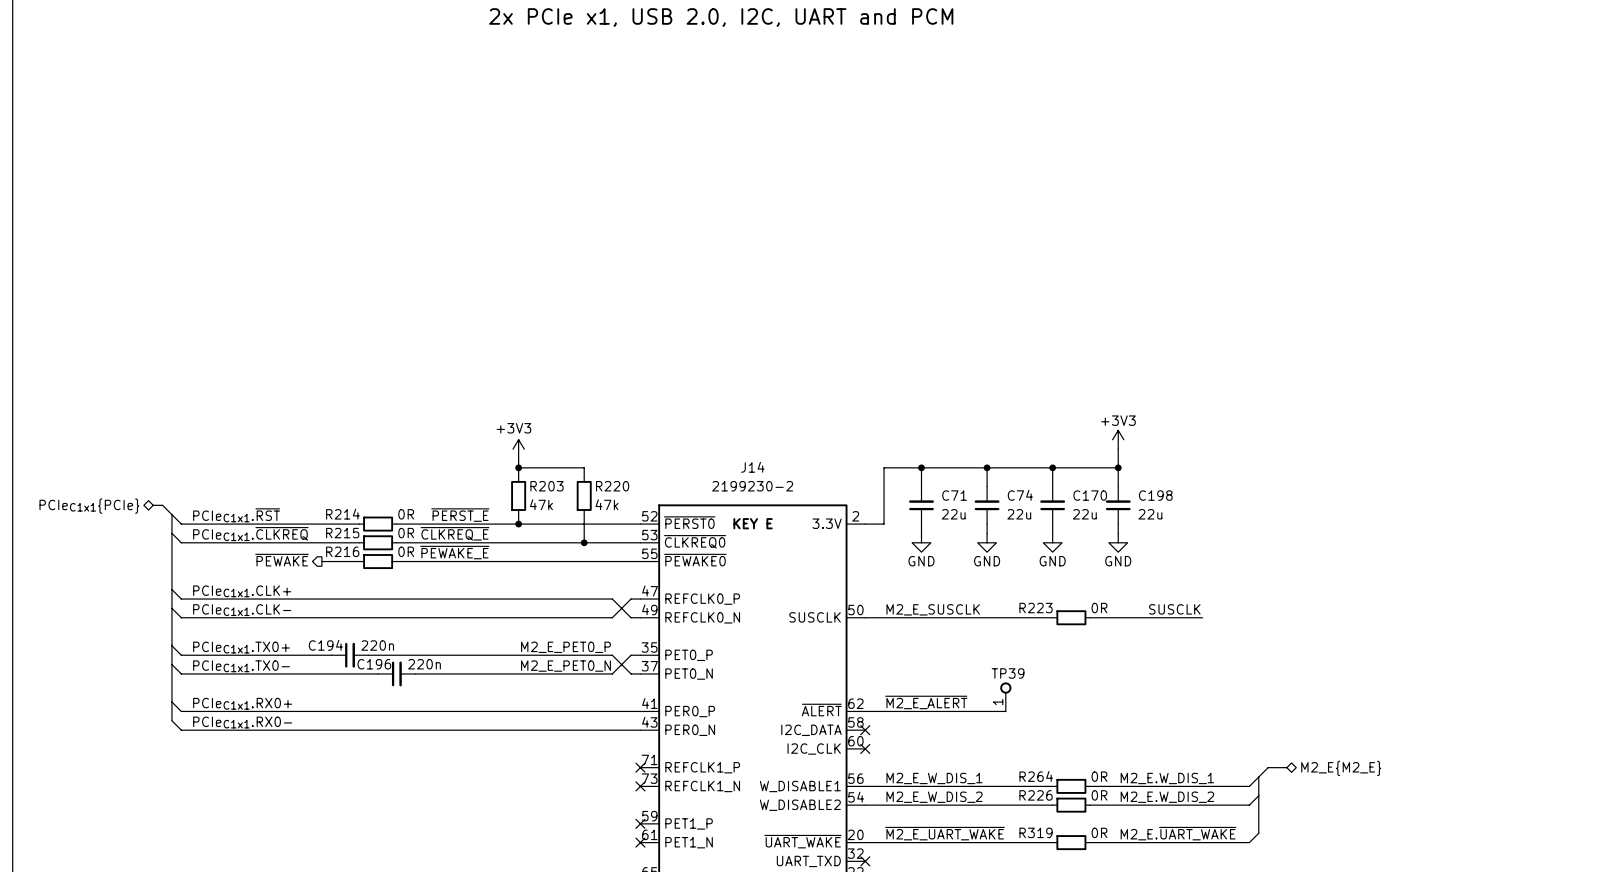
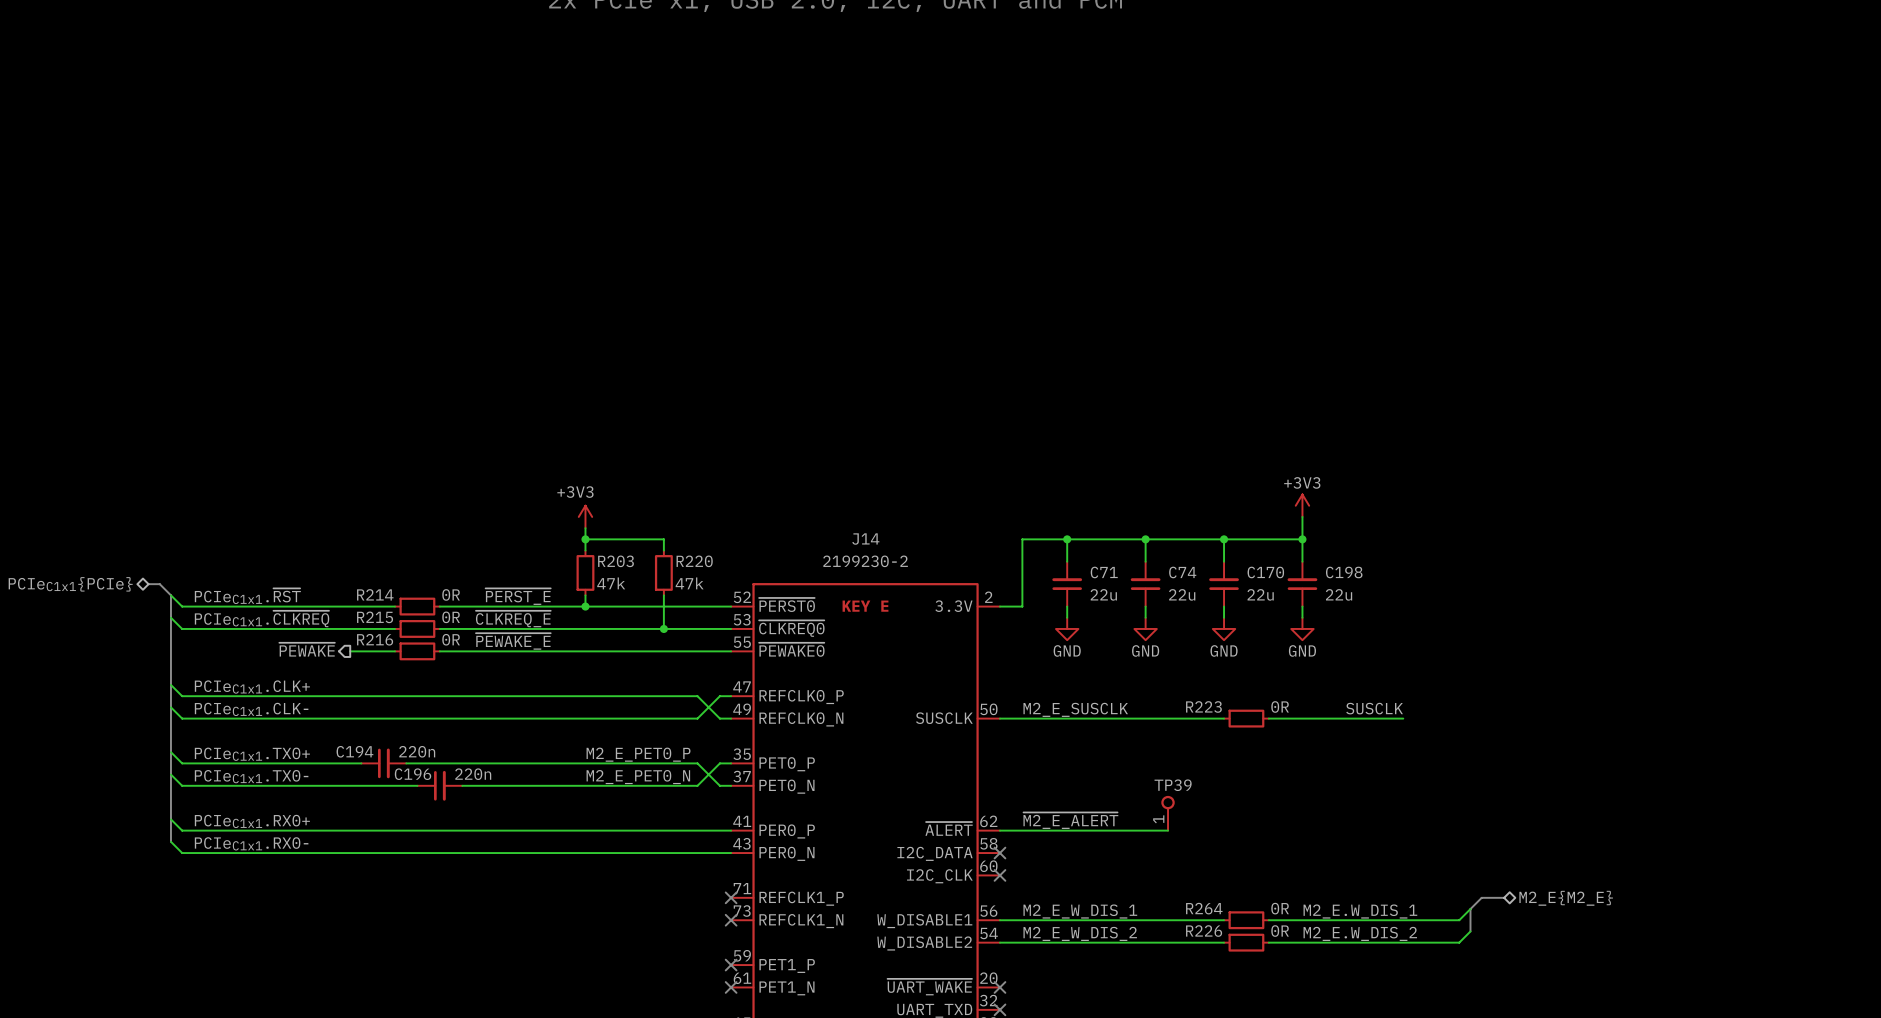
bus: (1258, 795) (1258, 833) -> none
label: ~{M2_E_UART_WAKE} (944, 833) -> none
label: M2_E.~{UART_WAKE} (1178, 833) -> none
wire: (1258, 833) (1249, 842) (1090, 842) -> none
wire: (865, 842) (1052, 842) -> none
no-connect mark: none -> (999, 987)
R319: (1071, 842) -> none

